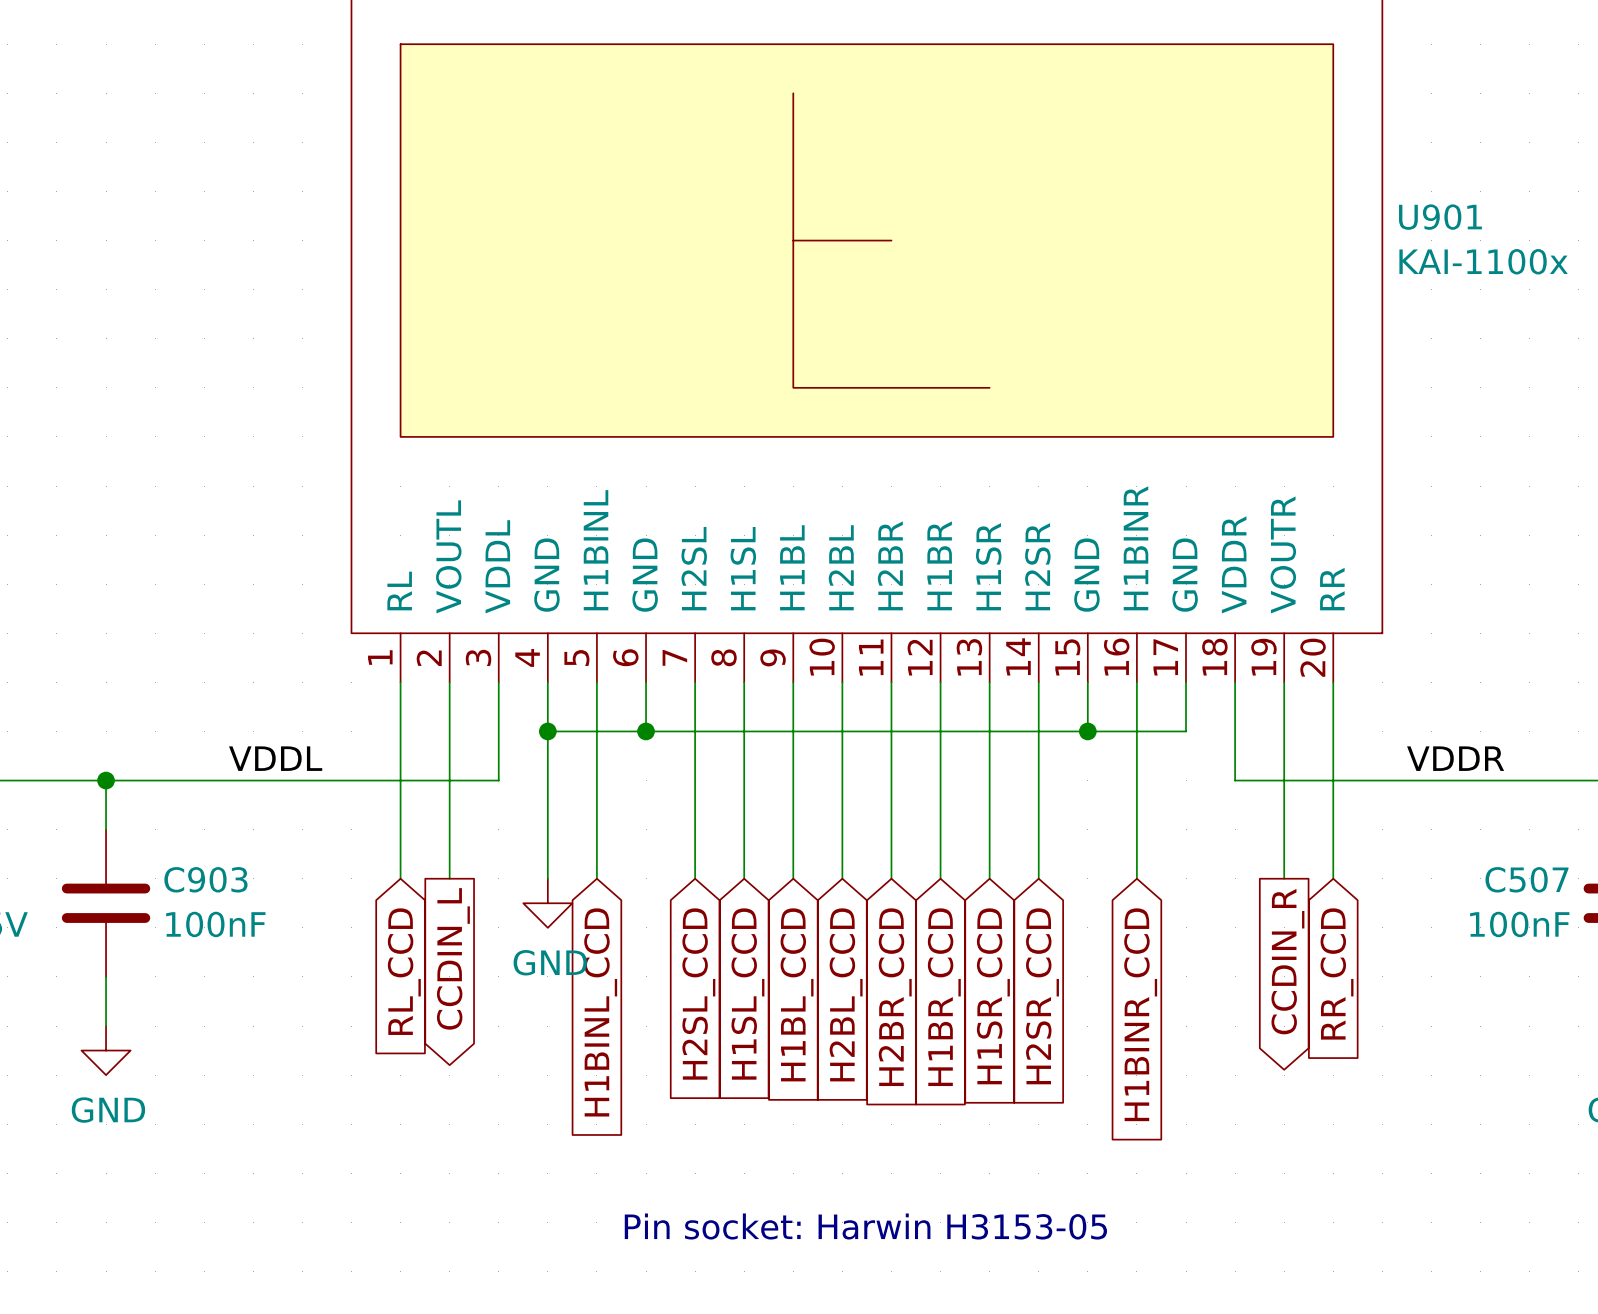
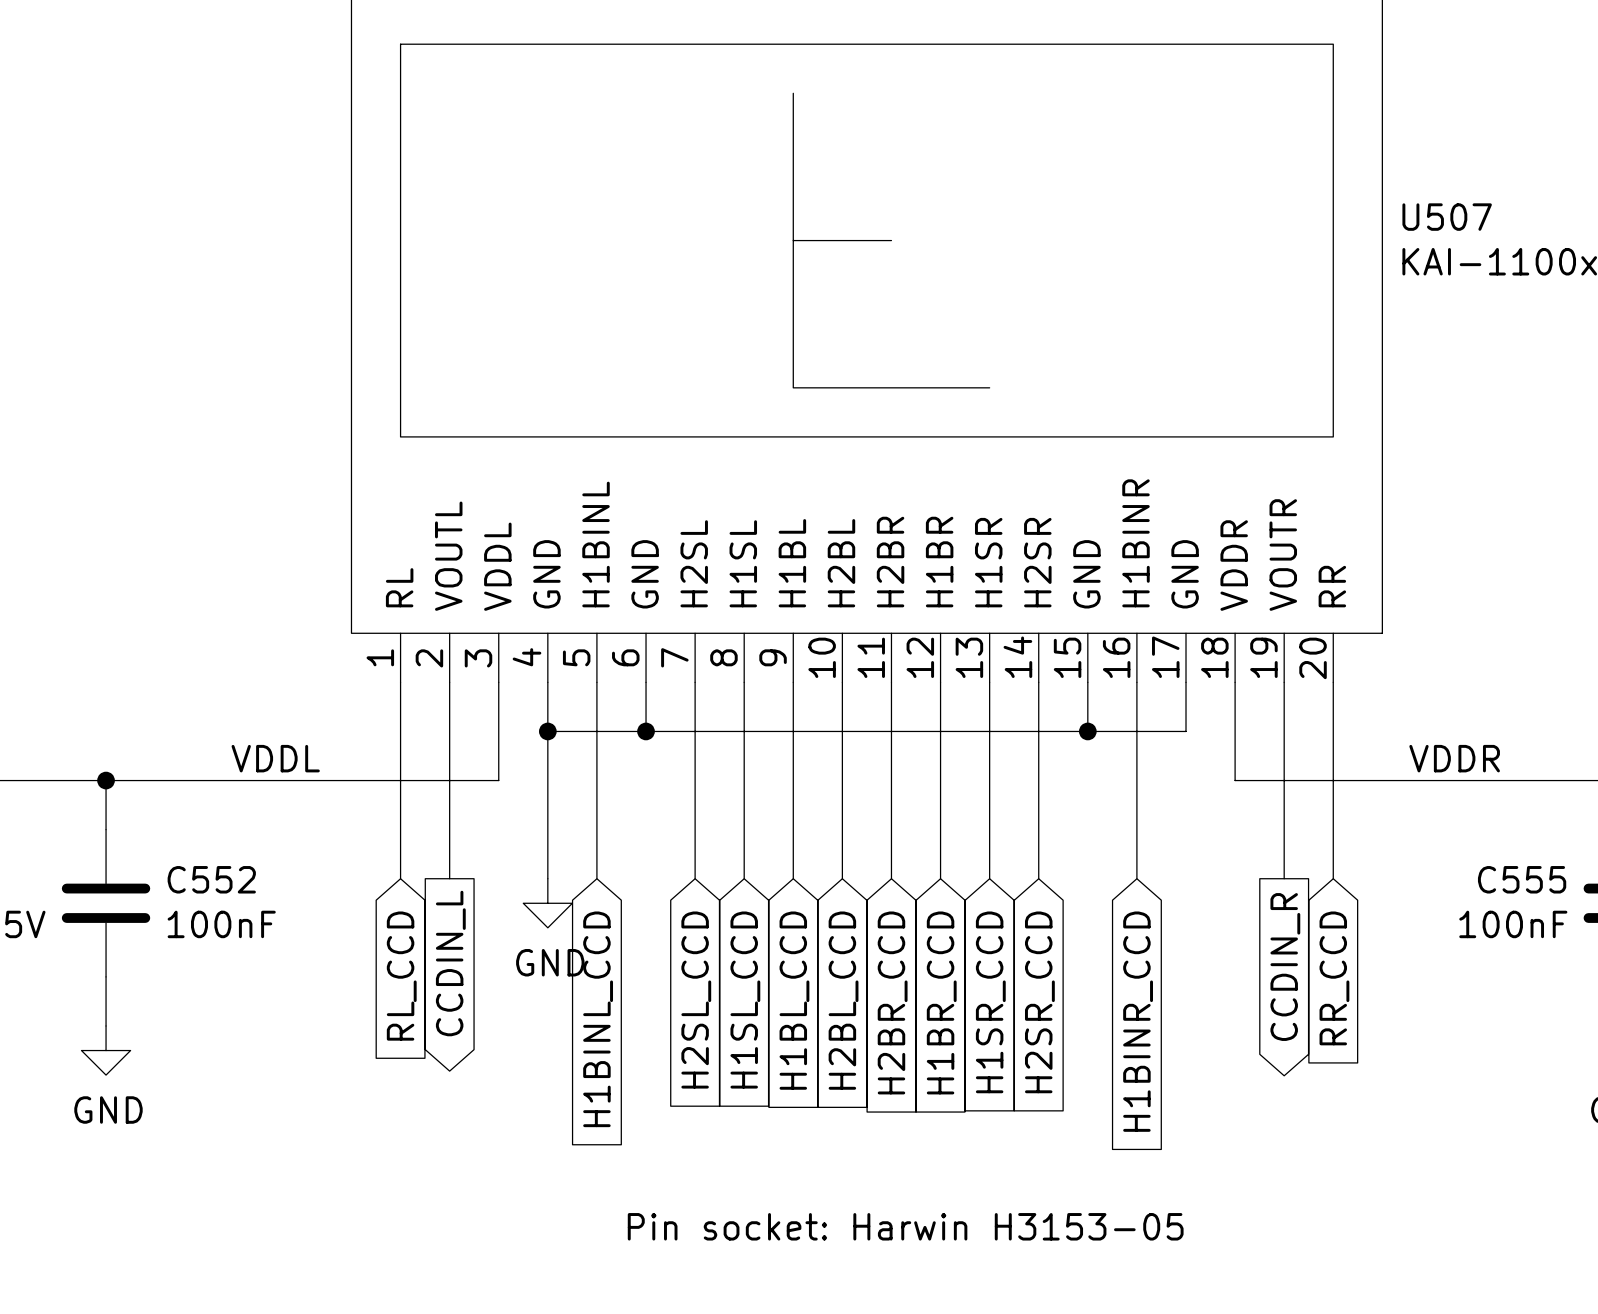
U901 name: U901 (1440, 217) -> U507 (1447, 217)
C903 name: C903 (205, 879) -> C552 (211, 879)
C507 name: C507 (1526, 879) -> C555 (1522, 879)

